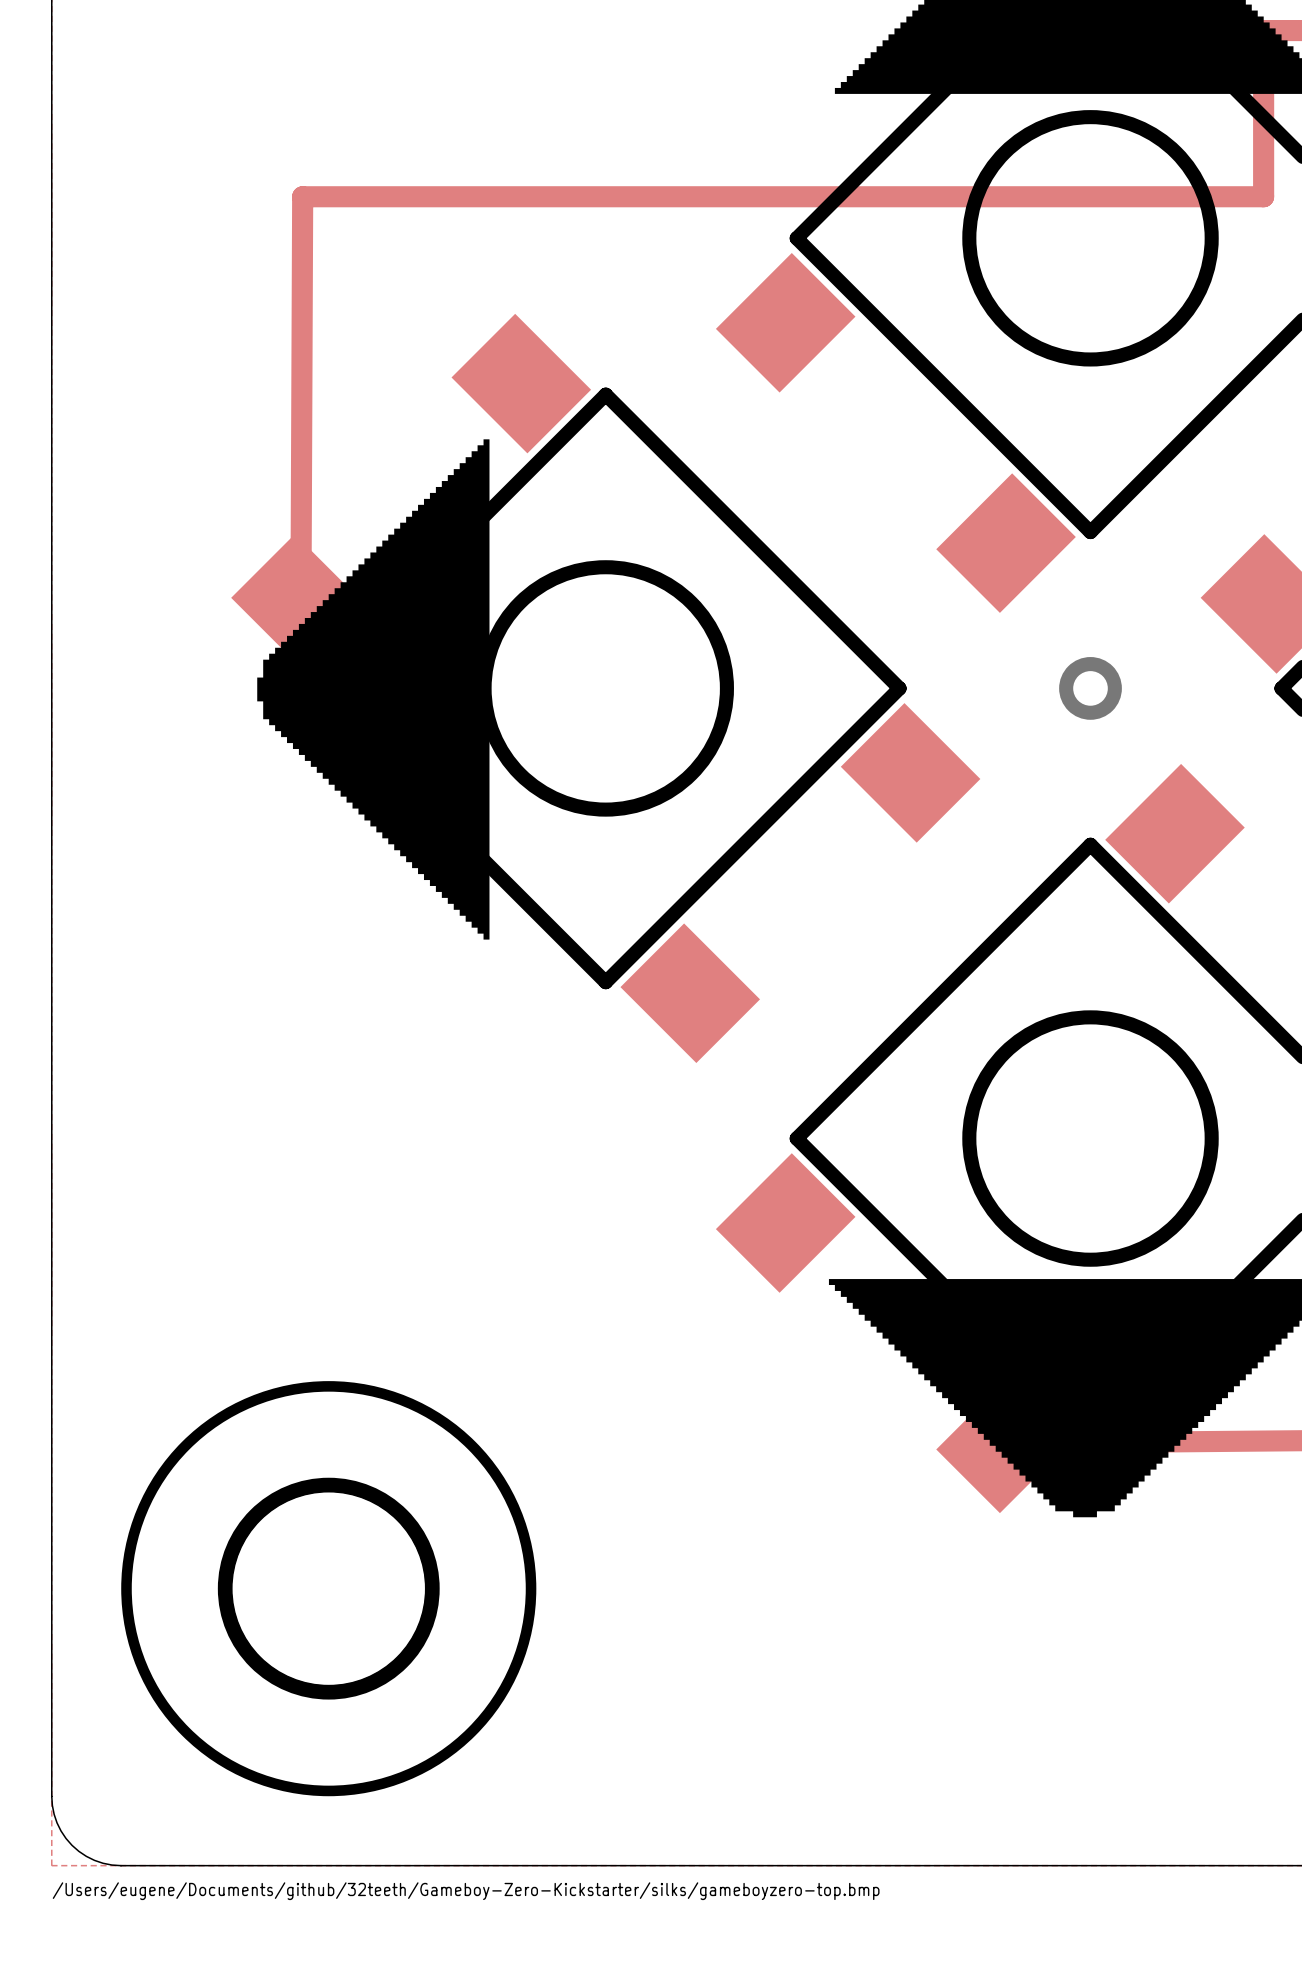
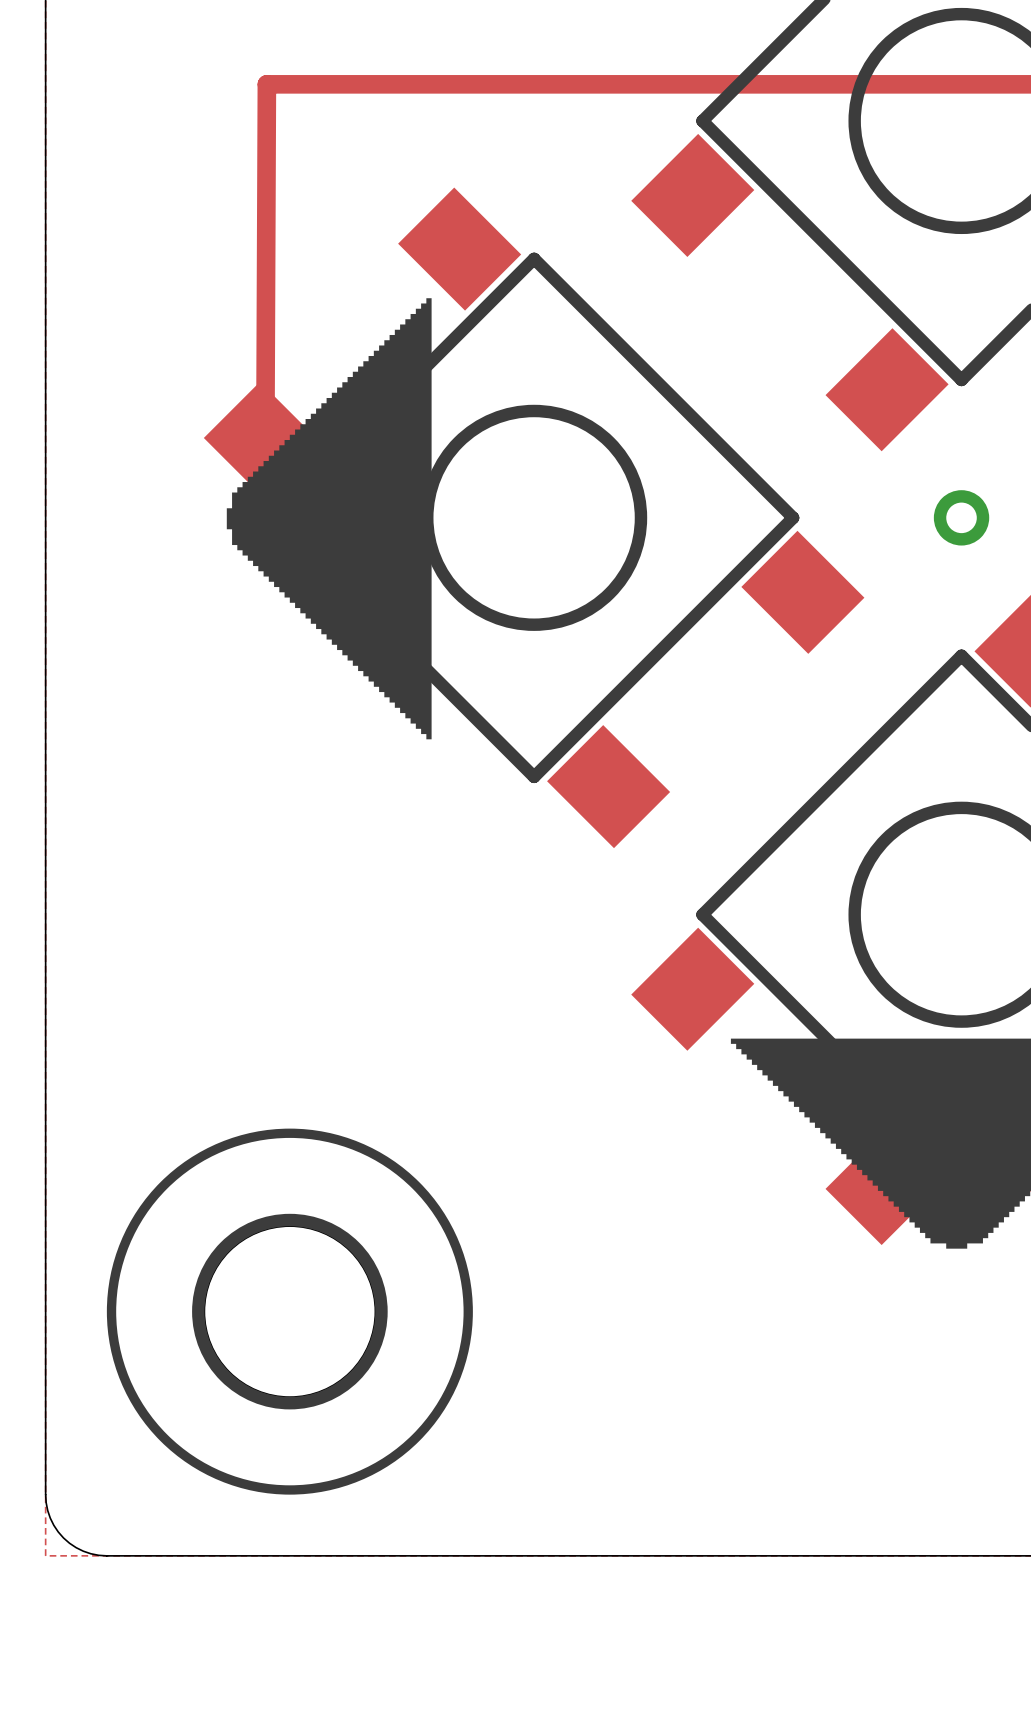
text: /Users/eugene/Documents/github/32teeth/Gameboy-Zero-Kickstarter/silks/gameboyzero-top.bmp (466, 1891) -> none

